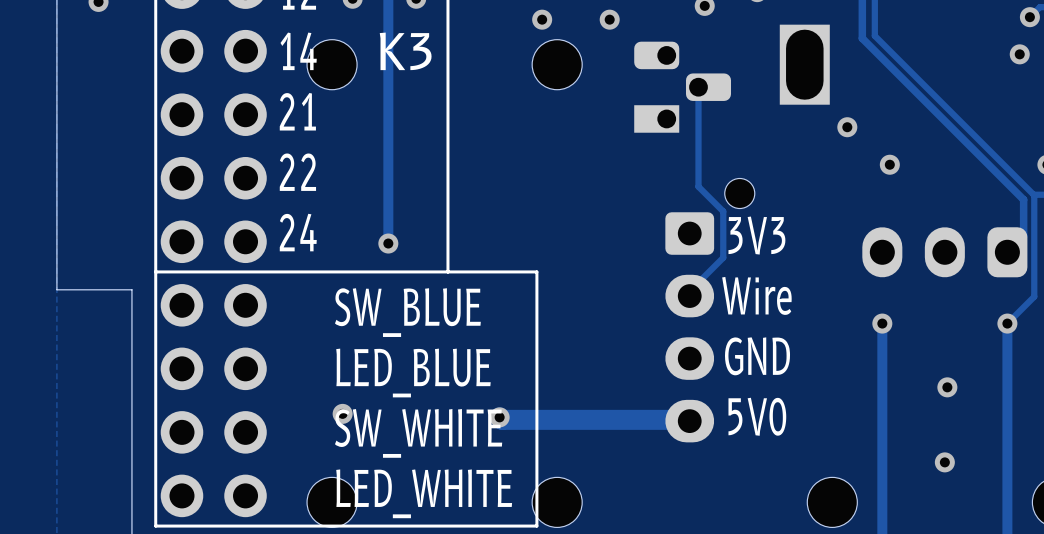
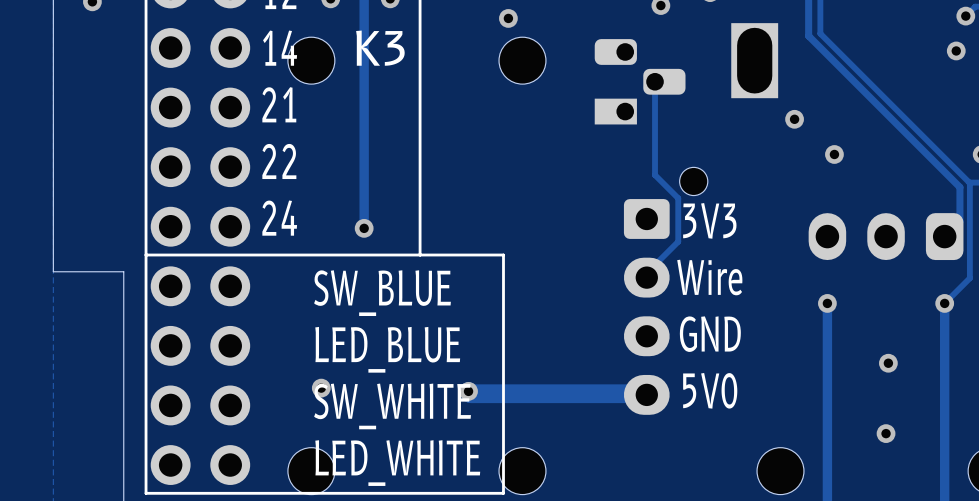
via: (609, 19) -> none

